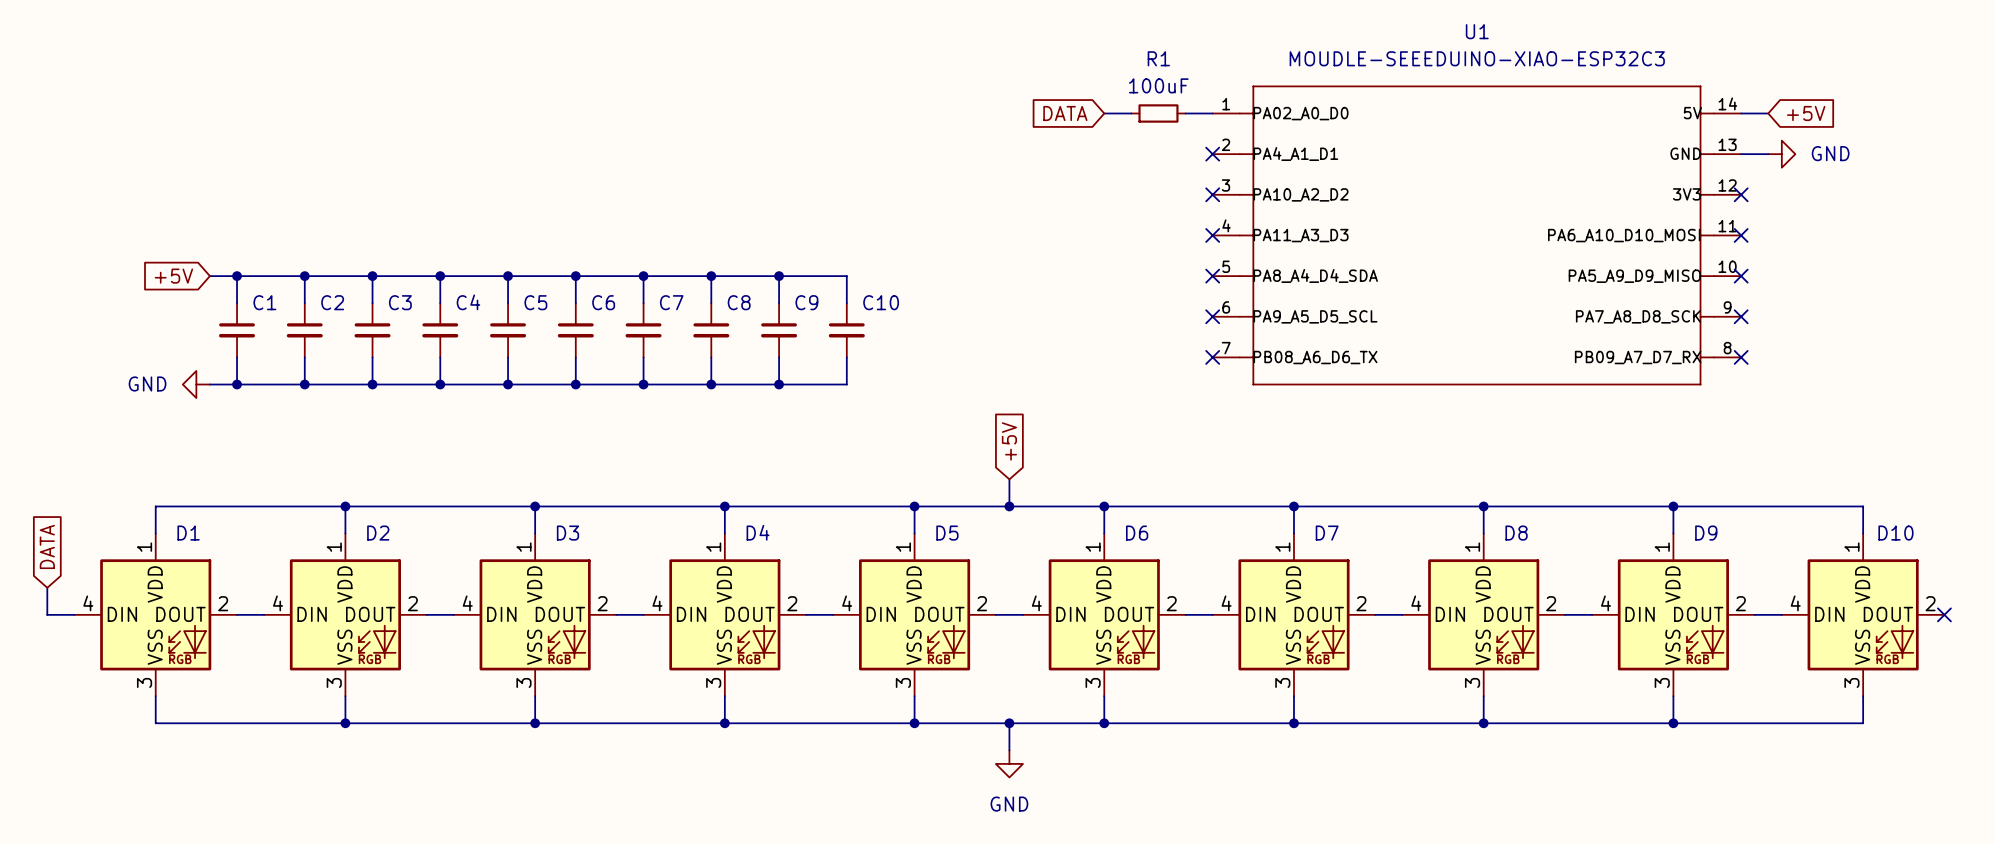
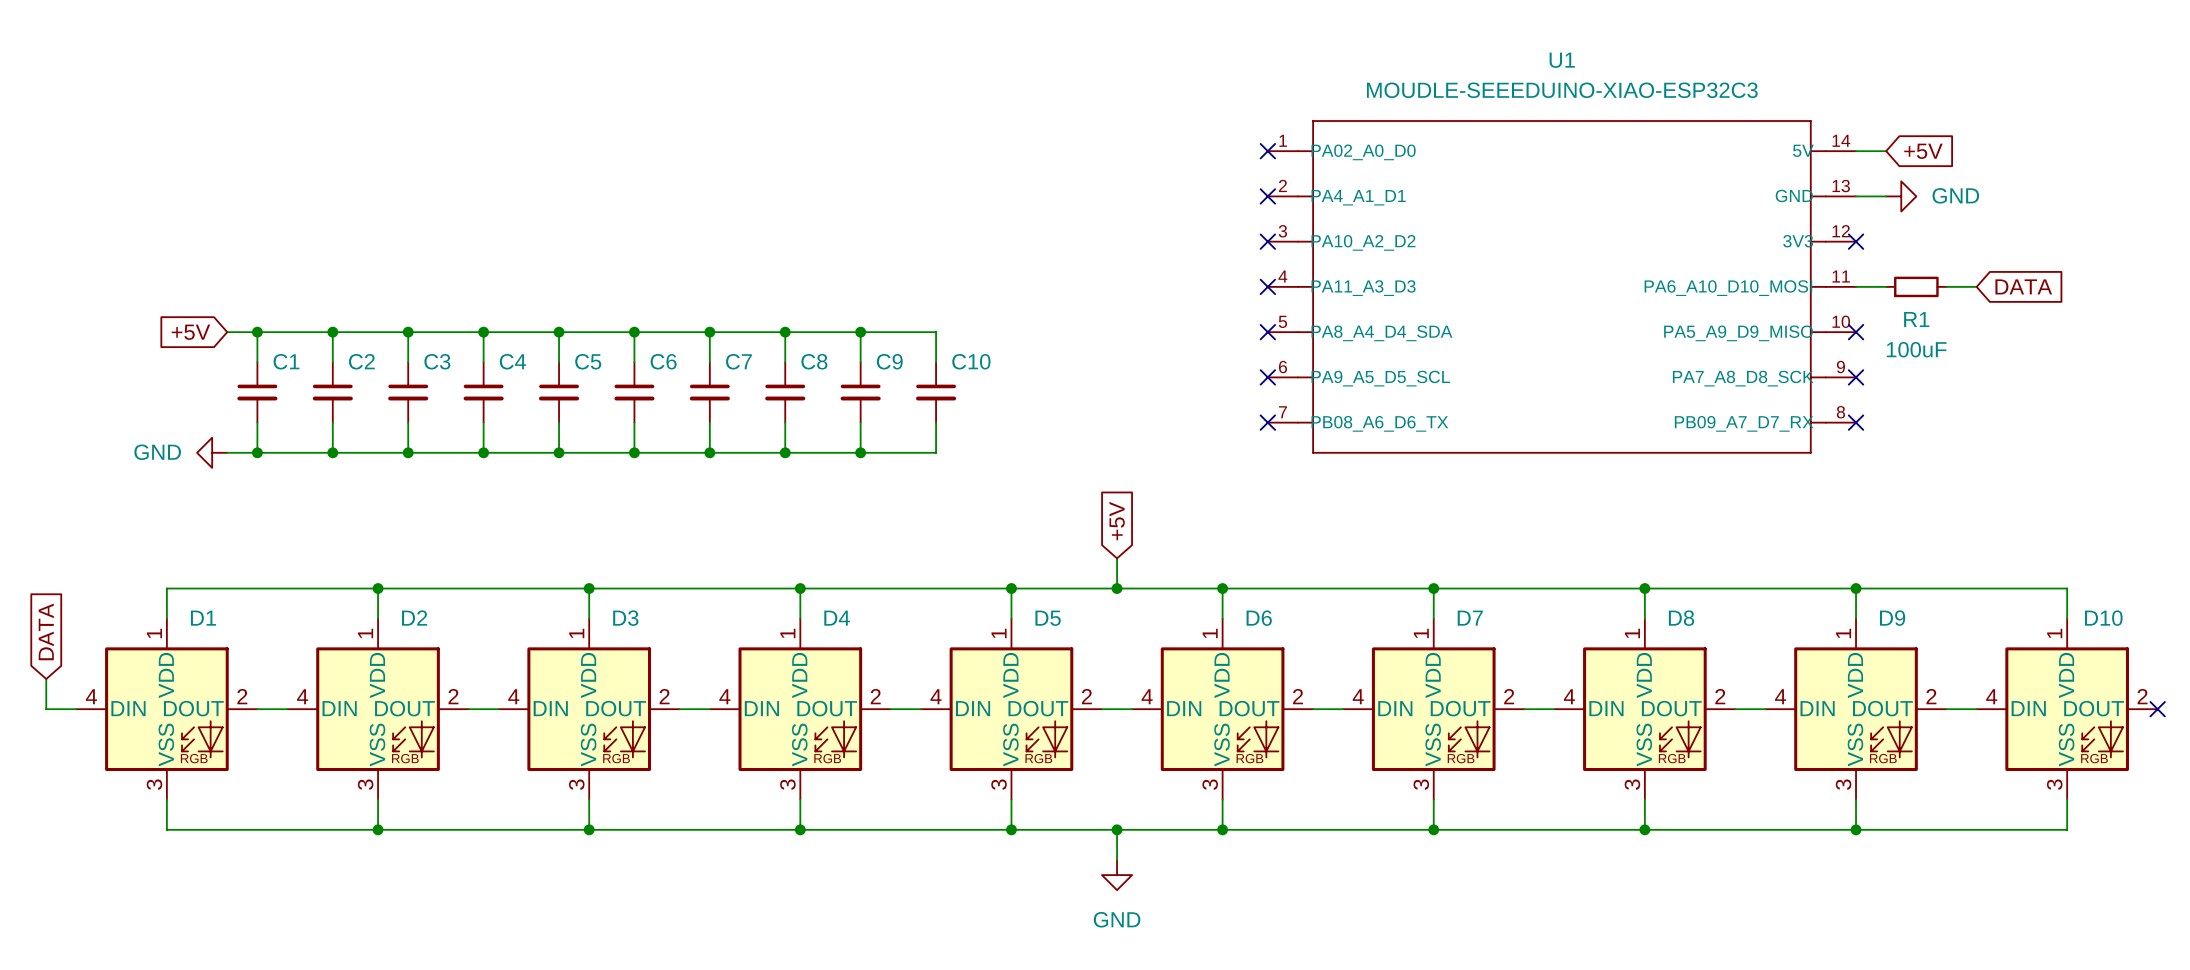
R1 name position: R1 (1158, 58) -> R1 (1916, 319)
R1 value position: 100uF (1158, 85) -> 100uF (1916, 349)
global label: DATA (1065, 113) -> none
wire: (1104, 113) (1131, 113) -> none
no-connect mark: none -> (1267, 151)
R1 position: (1158, 113) -> (1916, 286)
wire: (1185, 113) (1212, 113) -> none
wire: (1741, 113) (1768, 113) -> (1856, 151) (1886, 151)
global label position: +5V (1806, 113) -> +5V (1923, 151)
no-connect mark: none -> (1267, 196)
no-connect mark: (1212, 154) -> none
wire: (1741, 154) (1768, 154) -> (1856, 196) (1886, 196)
power symbol position: GND (1781, 154) -> GND (1901, 196)
no-connect mark: none -> (1267, 241)
no-connect mark: (1212, 194) -> none
no-connect mark: none -> (1856, 241)
no-connect mark: (1741, 194) -> none
no-connect mark: none -> (1267, 286)
no-connect mark: (1212, 235) -> none
U1 position: (1476, 235) -> (1561, 286)
wire: none -> (1856, 286) (1886, 286)
no-connect mark: (1741, 235) -> none
wire: none -> (1946, 286) (1976, 286)
global label: none -> DATA (2023, 286)
no-connect mark: none -> (1267, 332)
no-connect mark: (1212, 276) -> none
no-connect mark: none -> (1856, 332)
no-connect mark: (1741, 276) -> none
no-connect mark: none -> (1267, 377)
no-connect mark: (1212, 316) -> none
no-connect mark: none -> (1856, 377)
no-connect mark: (1741, 316) -> none
no-connect mark: none -> (1267, 422)
no-connect mark: (1212, 357) -> none
no-connect mark: none -> (1856, 422)
no-connect mark: (1741, 357) -> none

